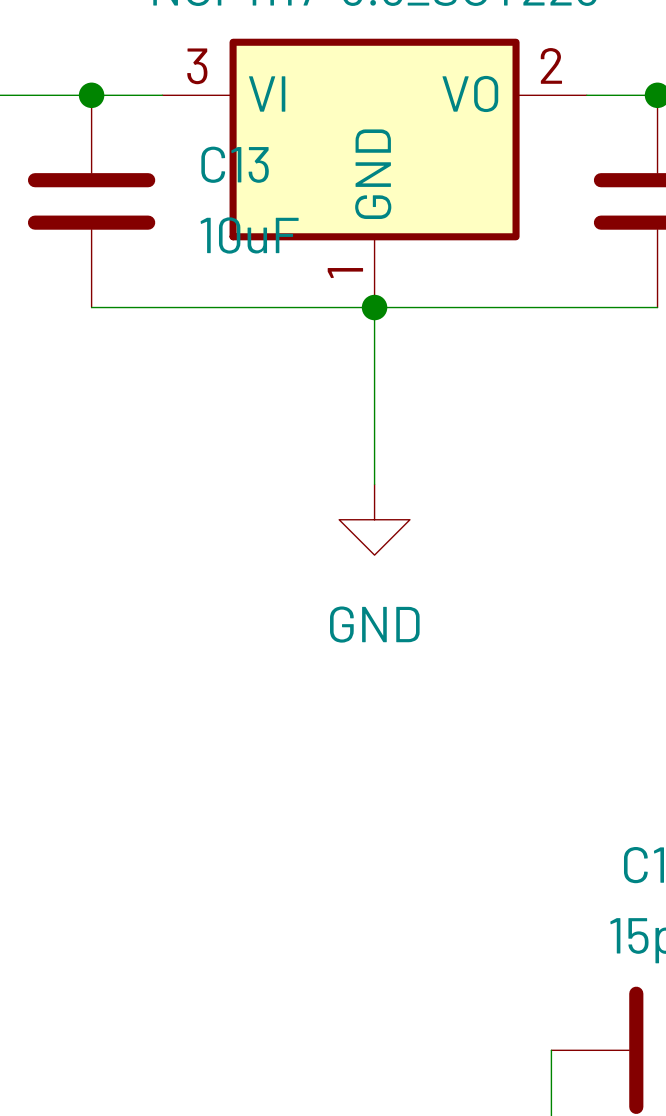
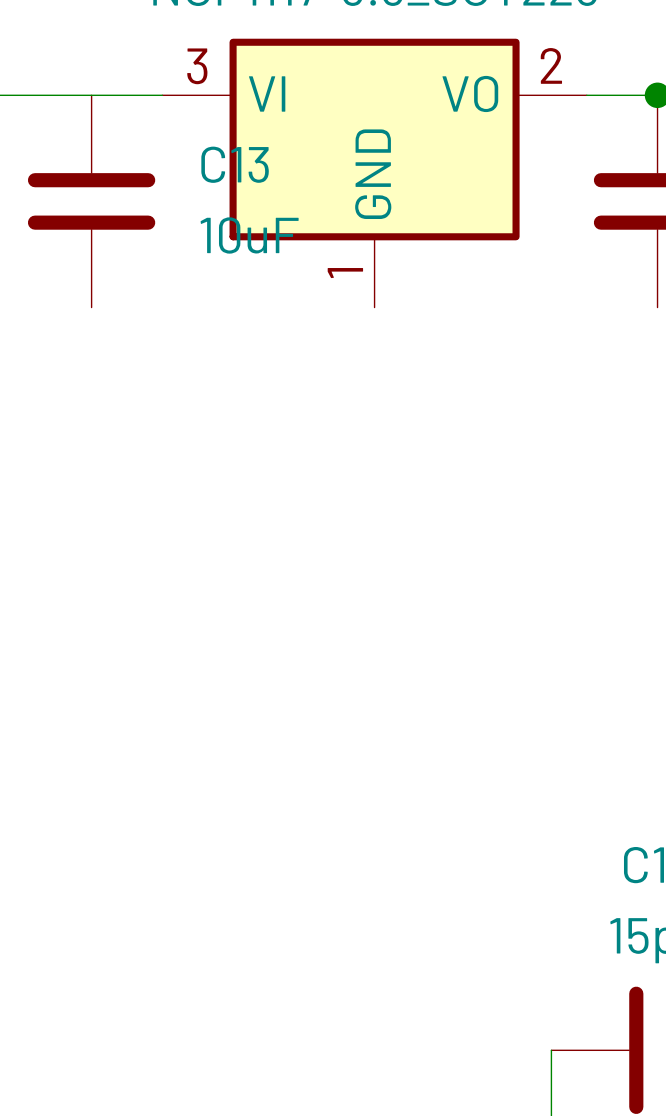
junction: (91, 95) -> none
wire: (91, 307) (657, 307) -> none
wire: (374, 307) (374, 484) -> none
junction: (374, 307) -> none
power symbol: GND (374, 519) -> none

